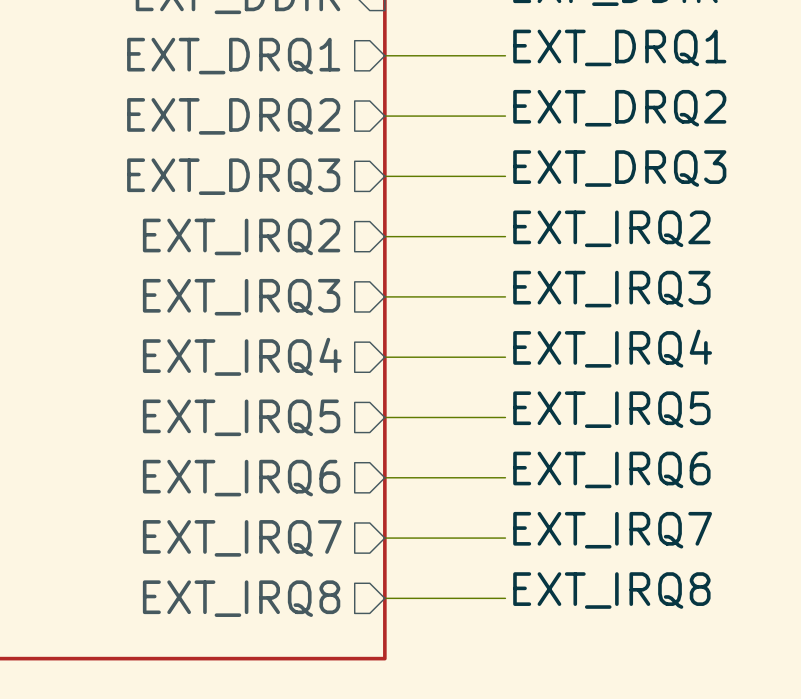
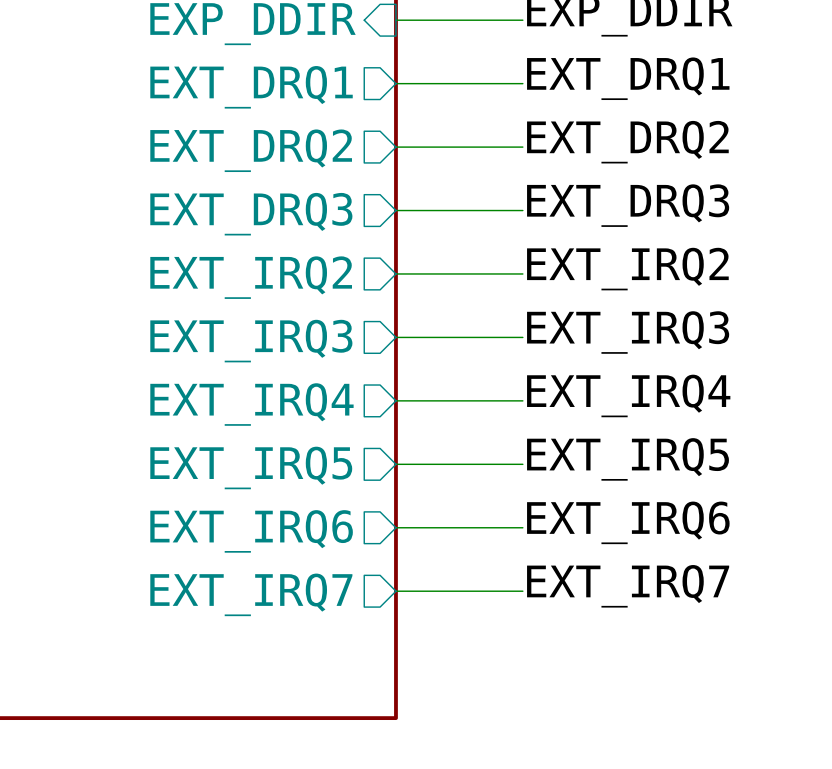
label: EXT_IRQ8 (611, 590) -> none
sheet pin: EXT_IRQ8 (241, 598) -> none
wire: (384, 598) (505, 598) -> none

